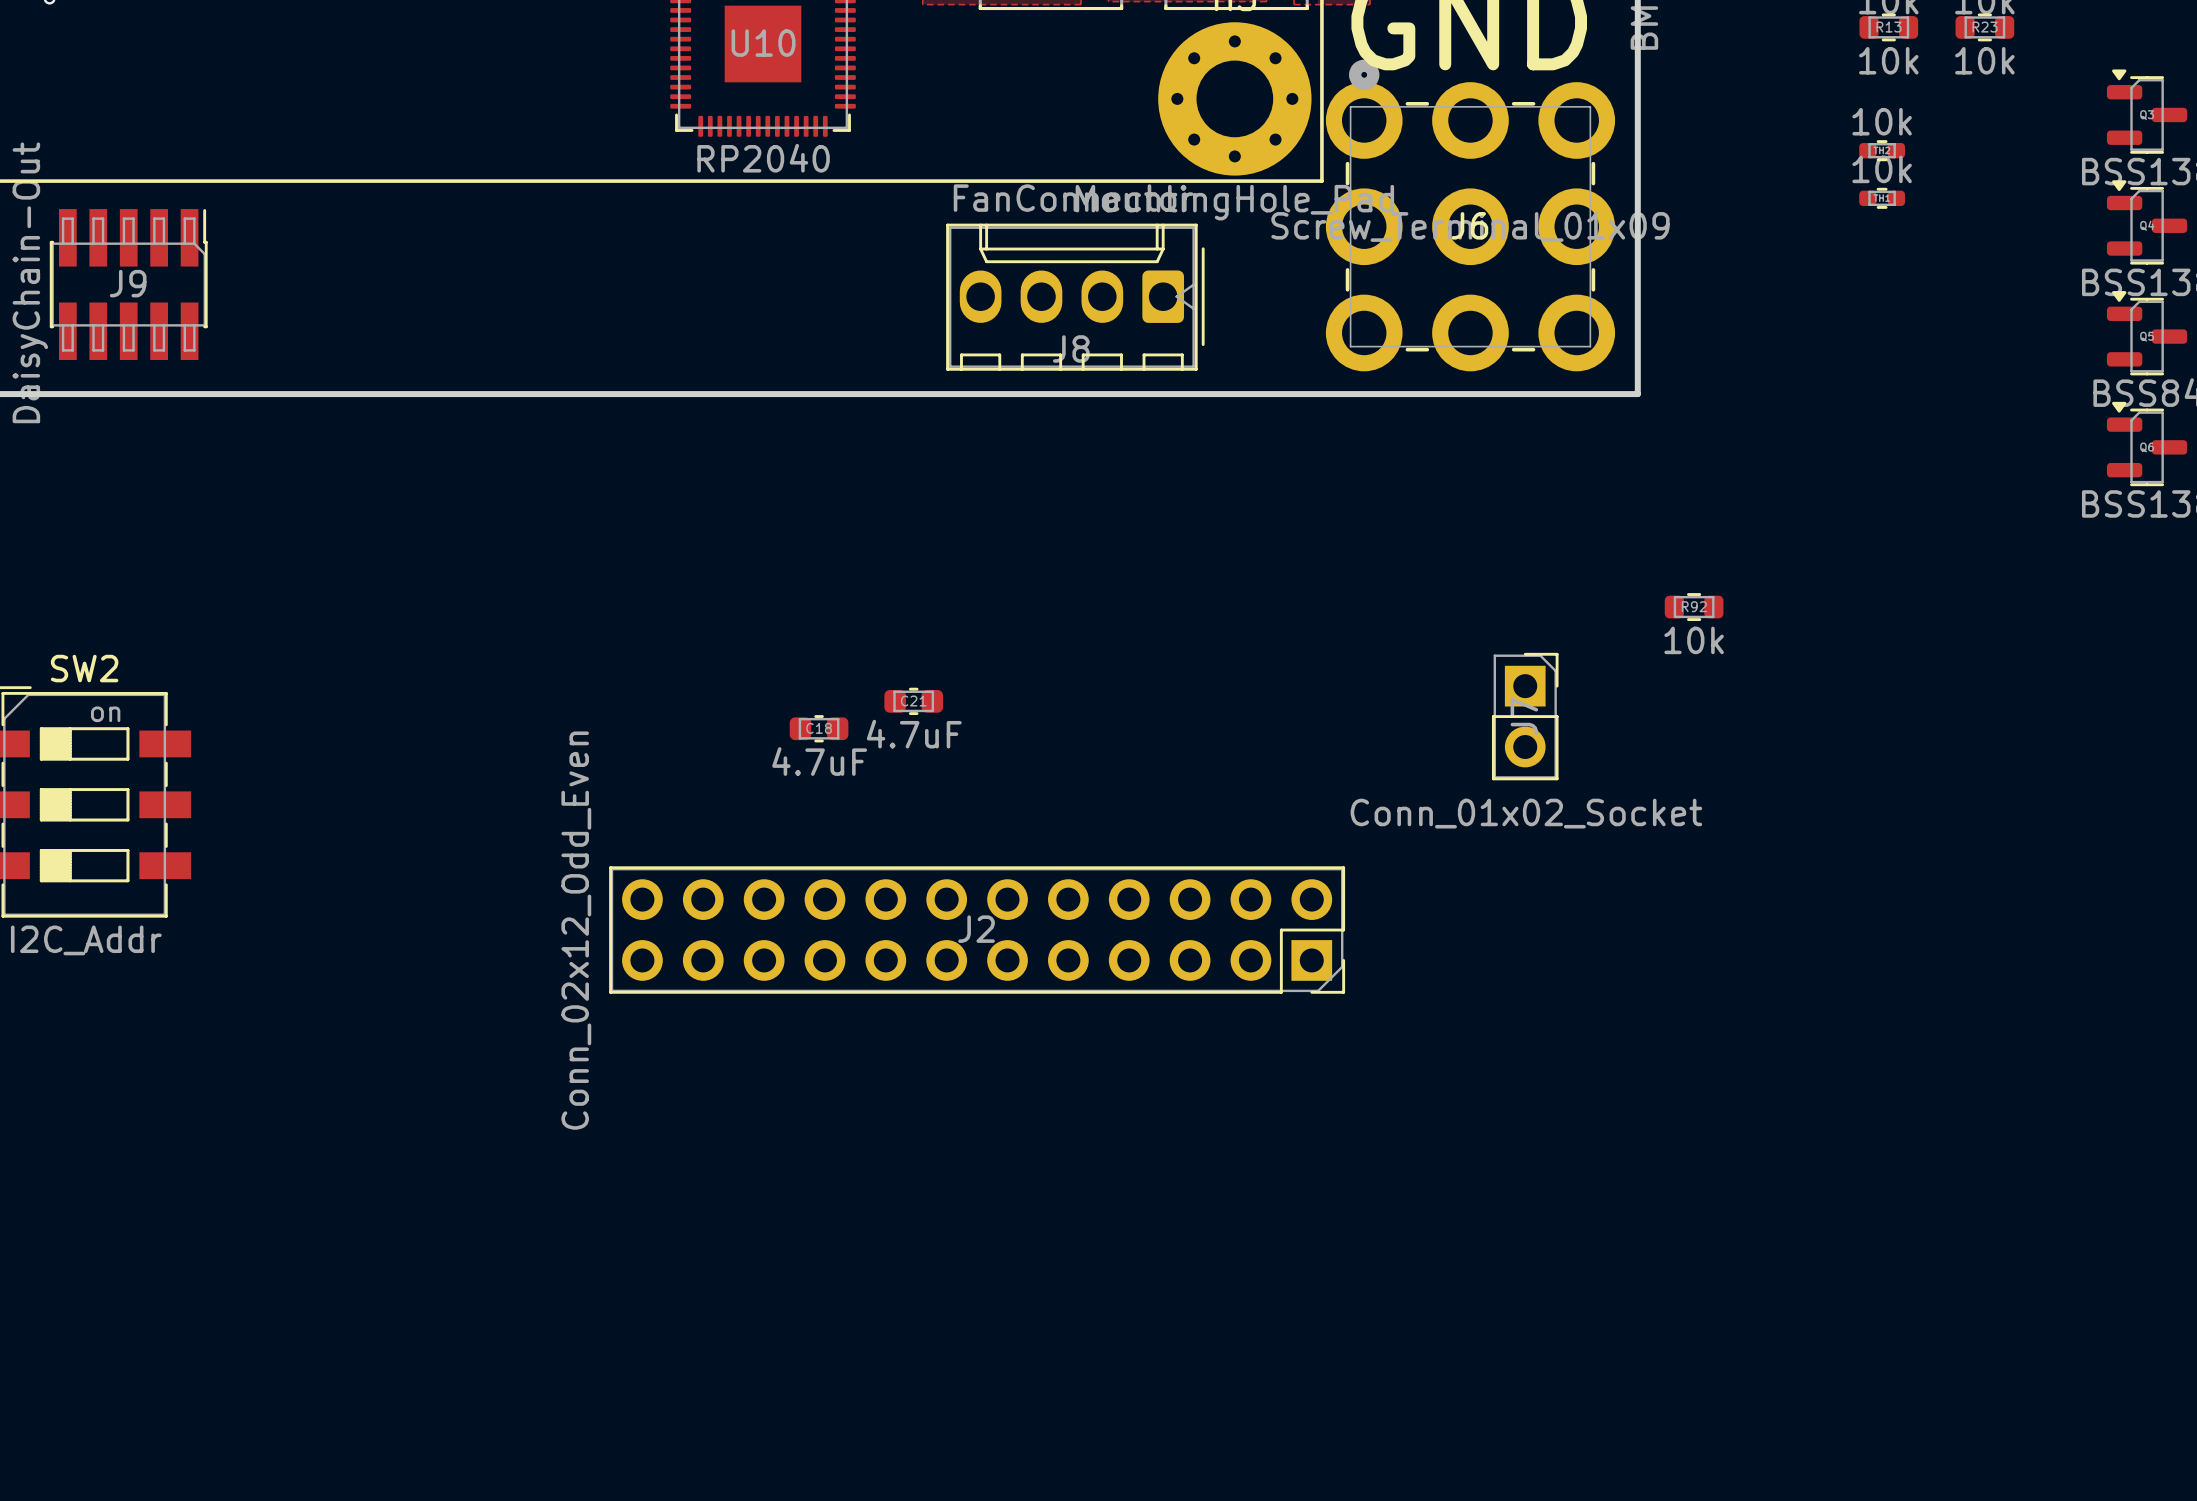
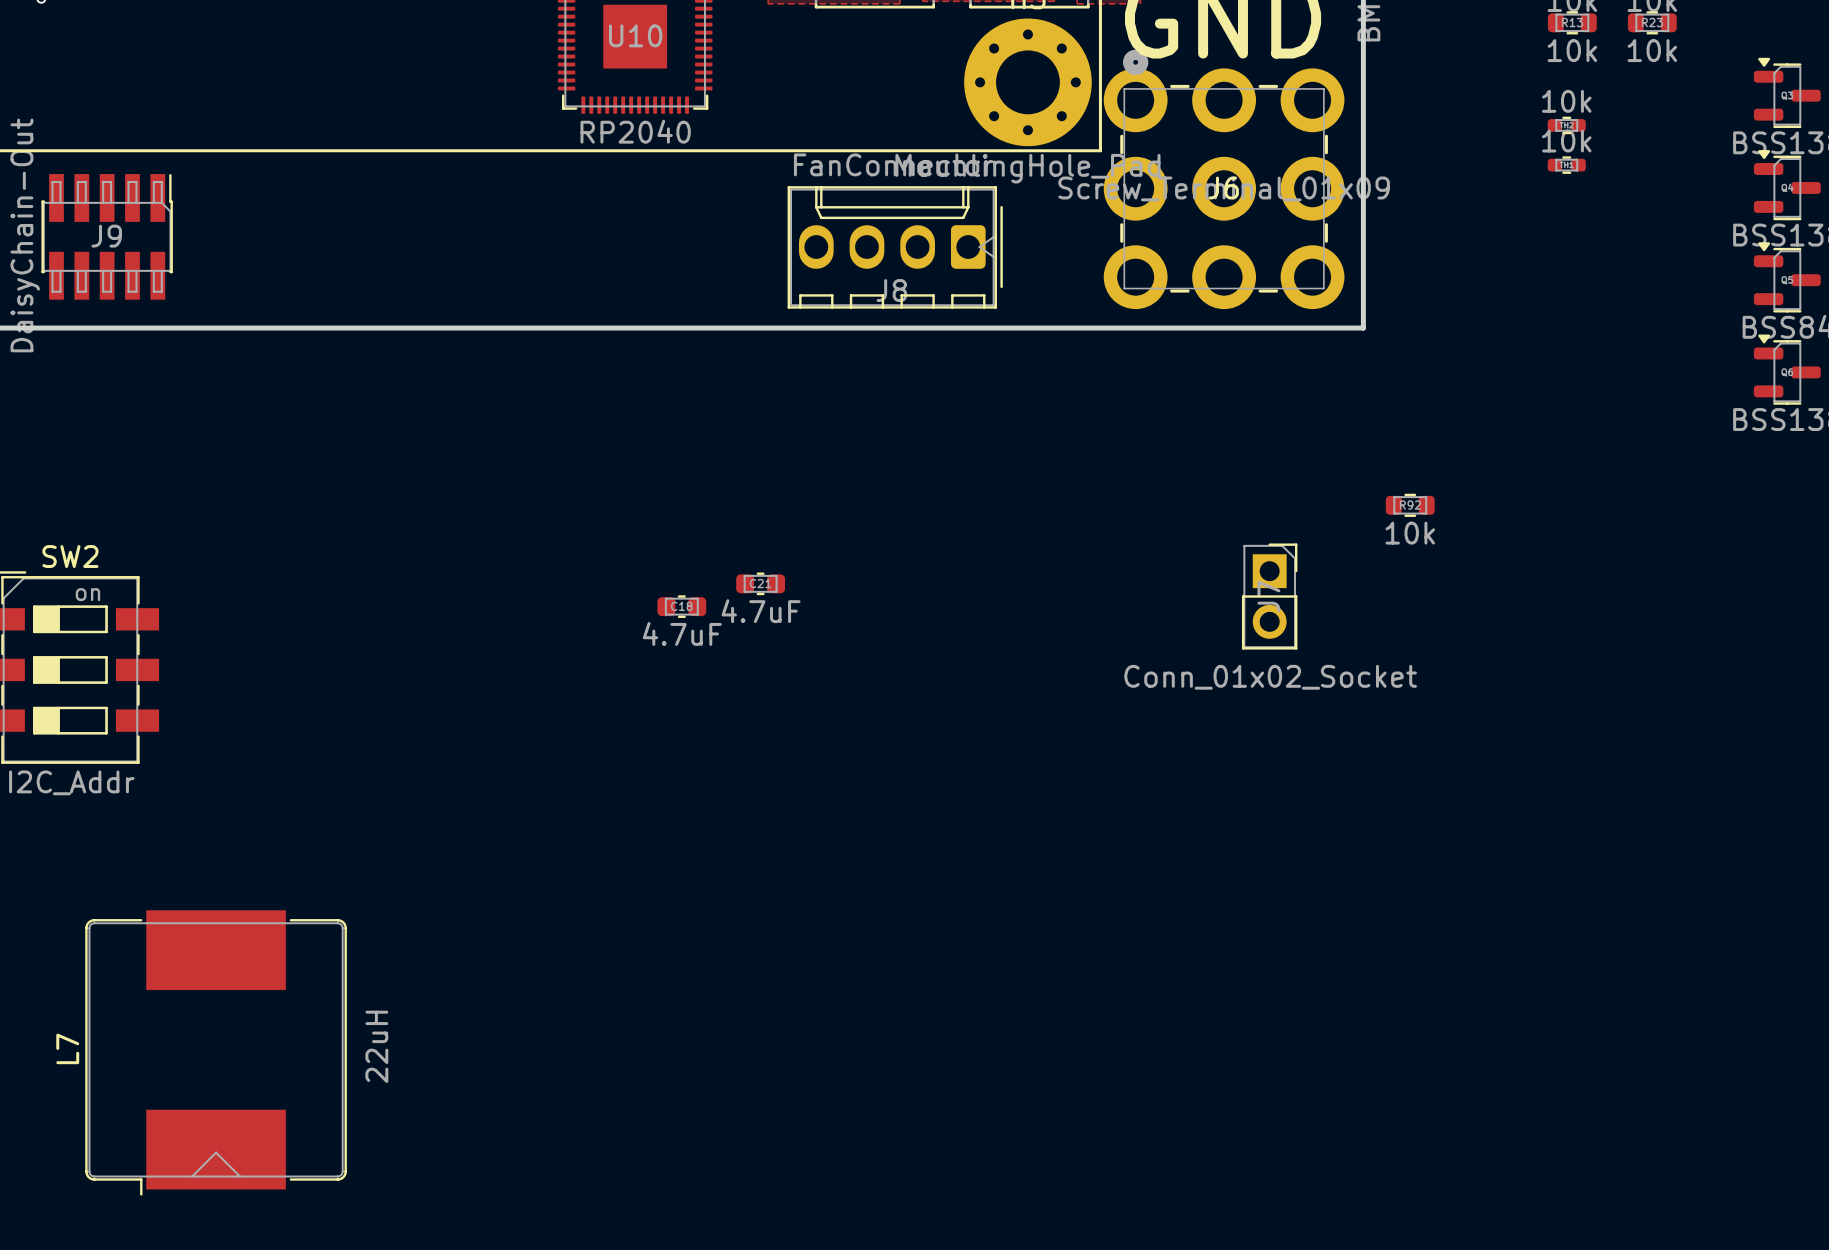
J2: Conn_02x12_Odd_Even (977, 930) -> none
L7: none -> 22uH (216, 1052)

